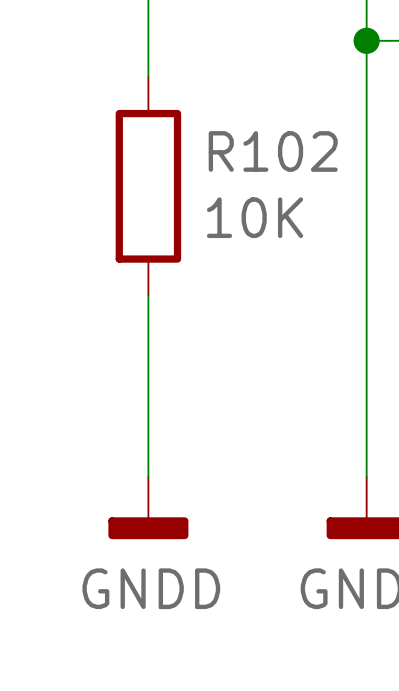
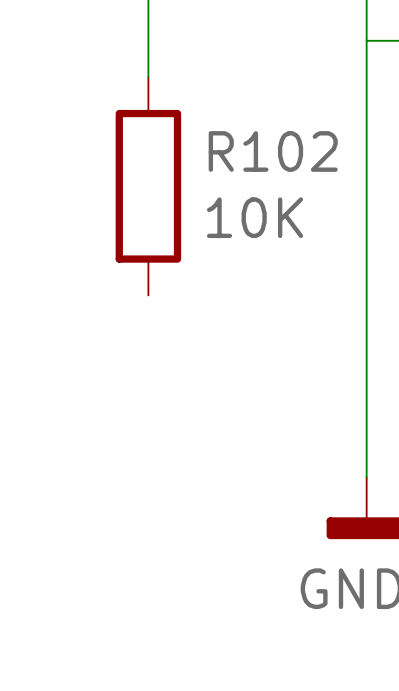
junction: (366, 40) -> none
wire: (148, 295) (148, 477) -> none
power symbol: GNDD (148, 508) -> none

